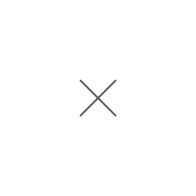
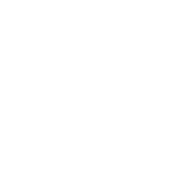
no-connect mark: (98, 98) -> none

